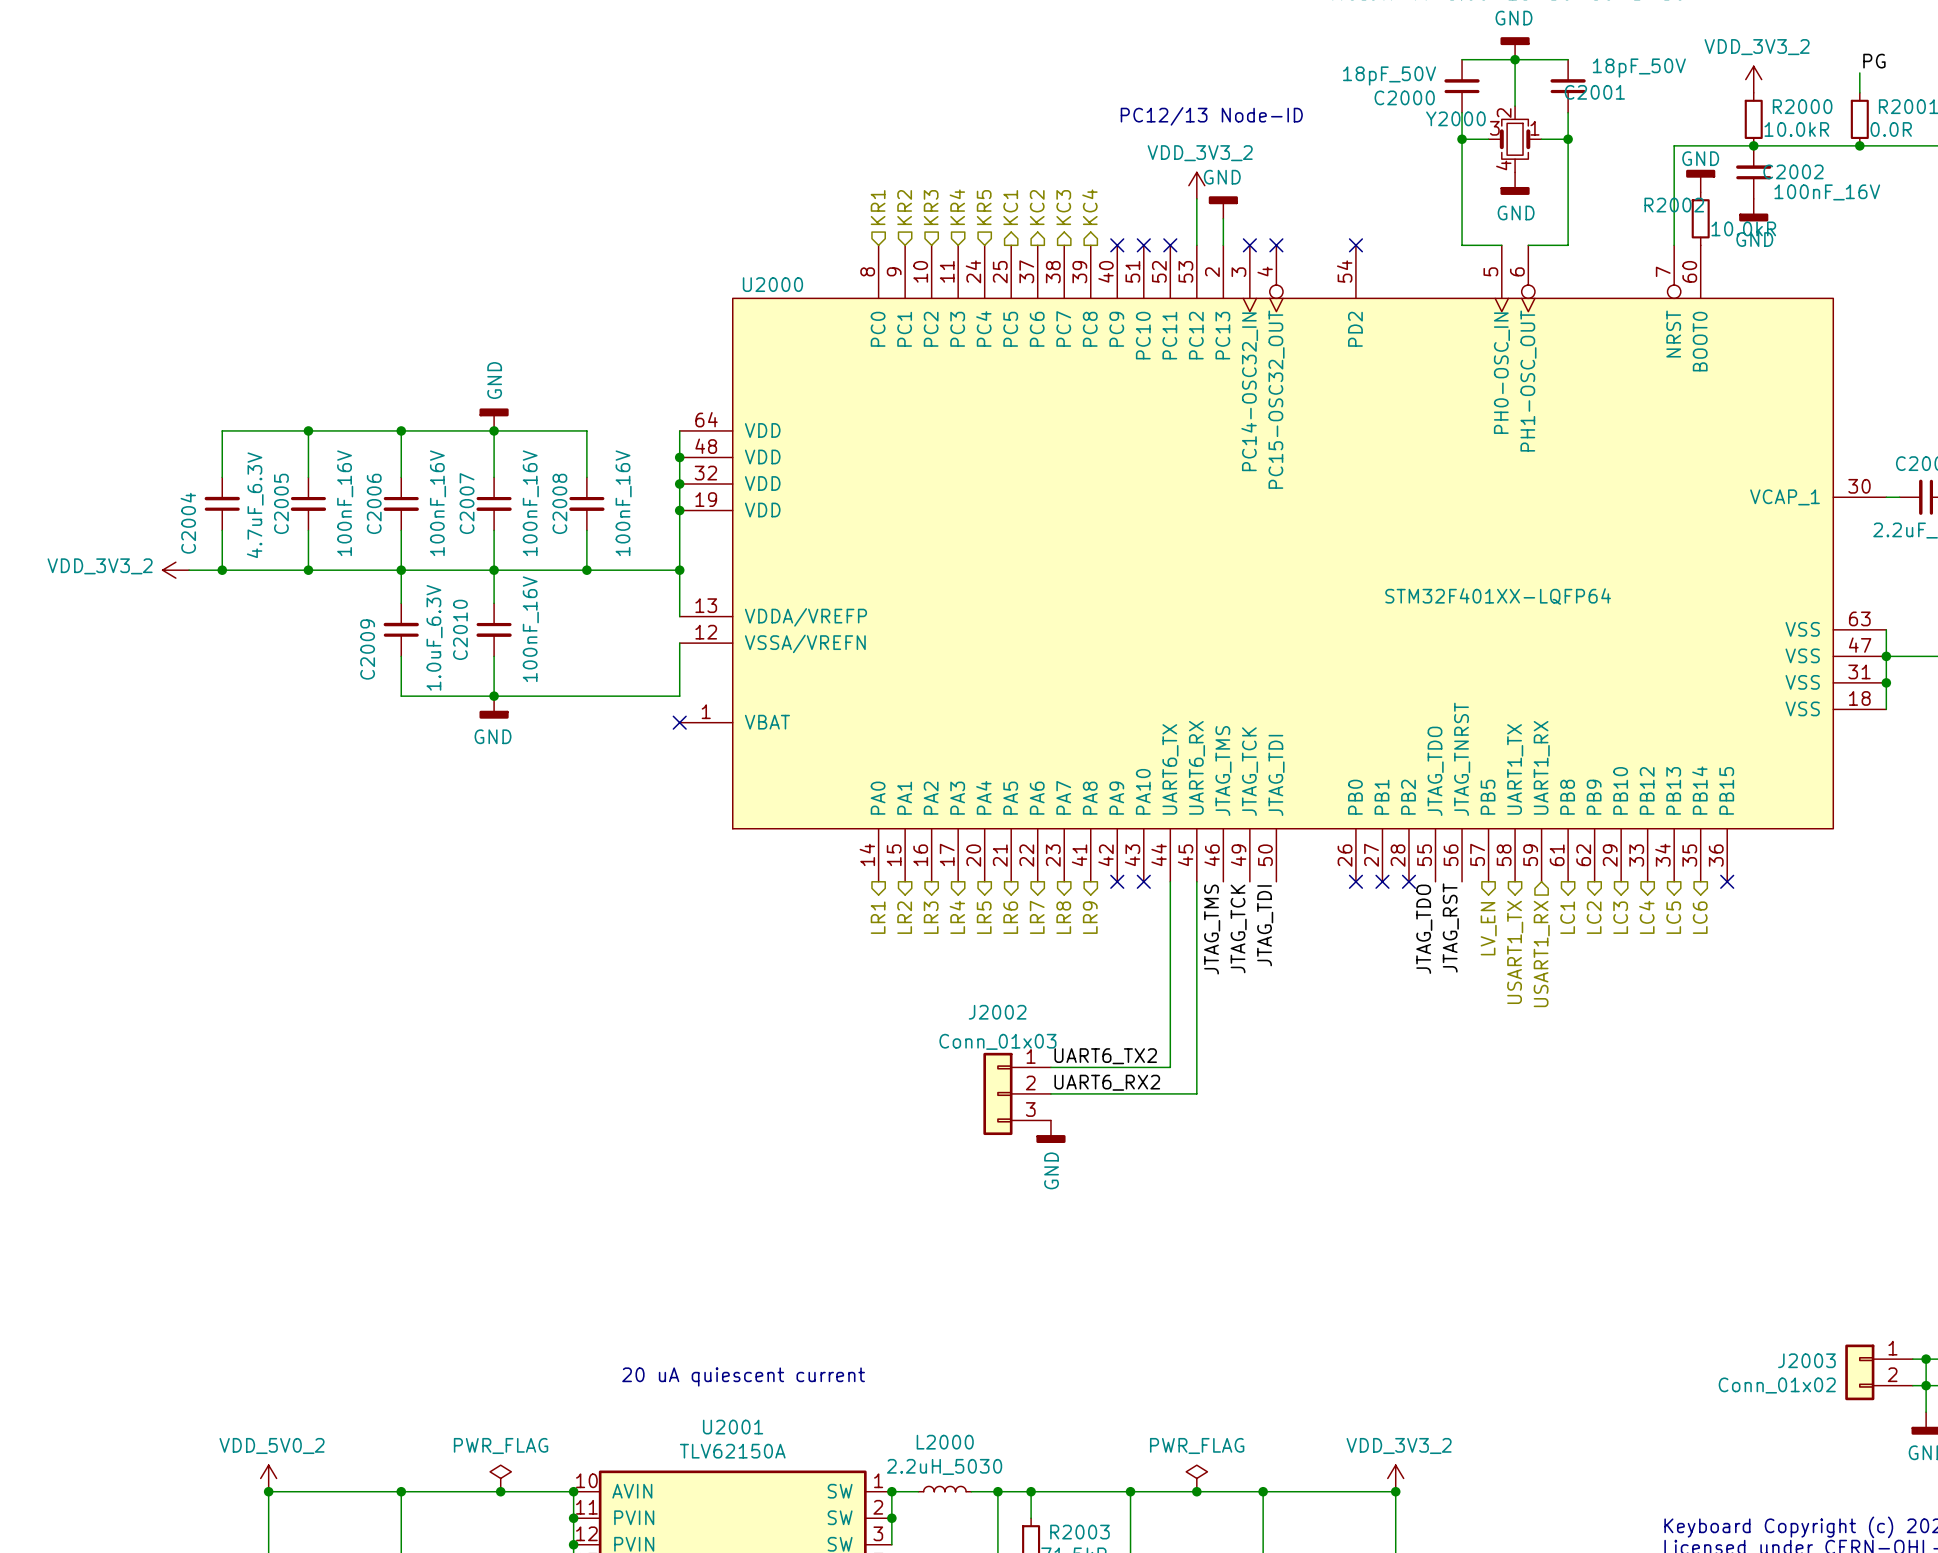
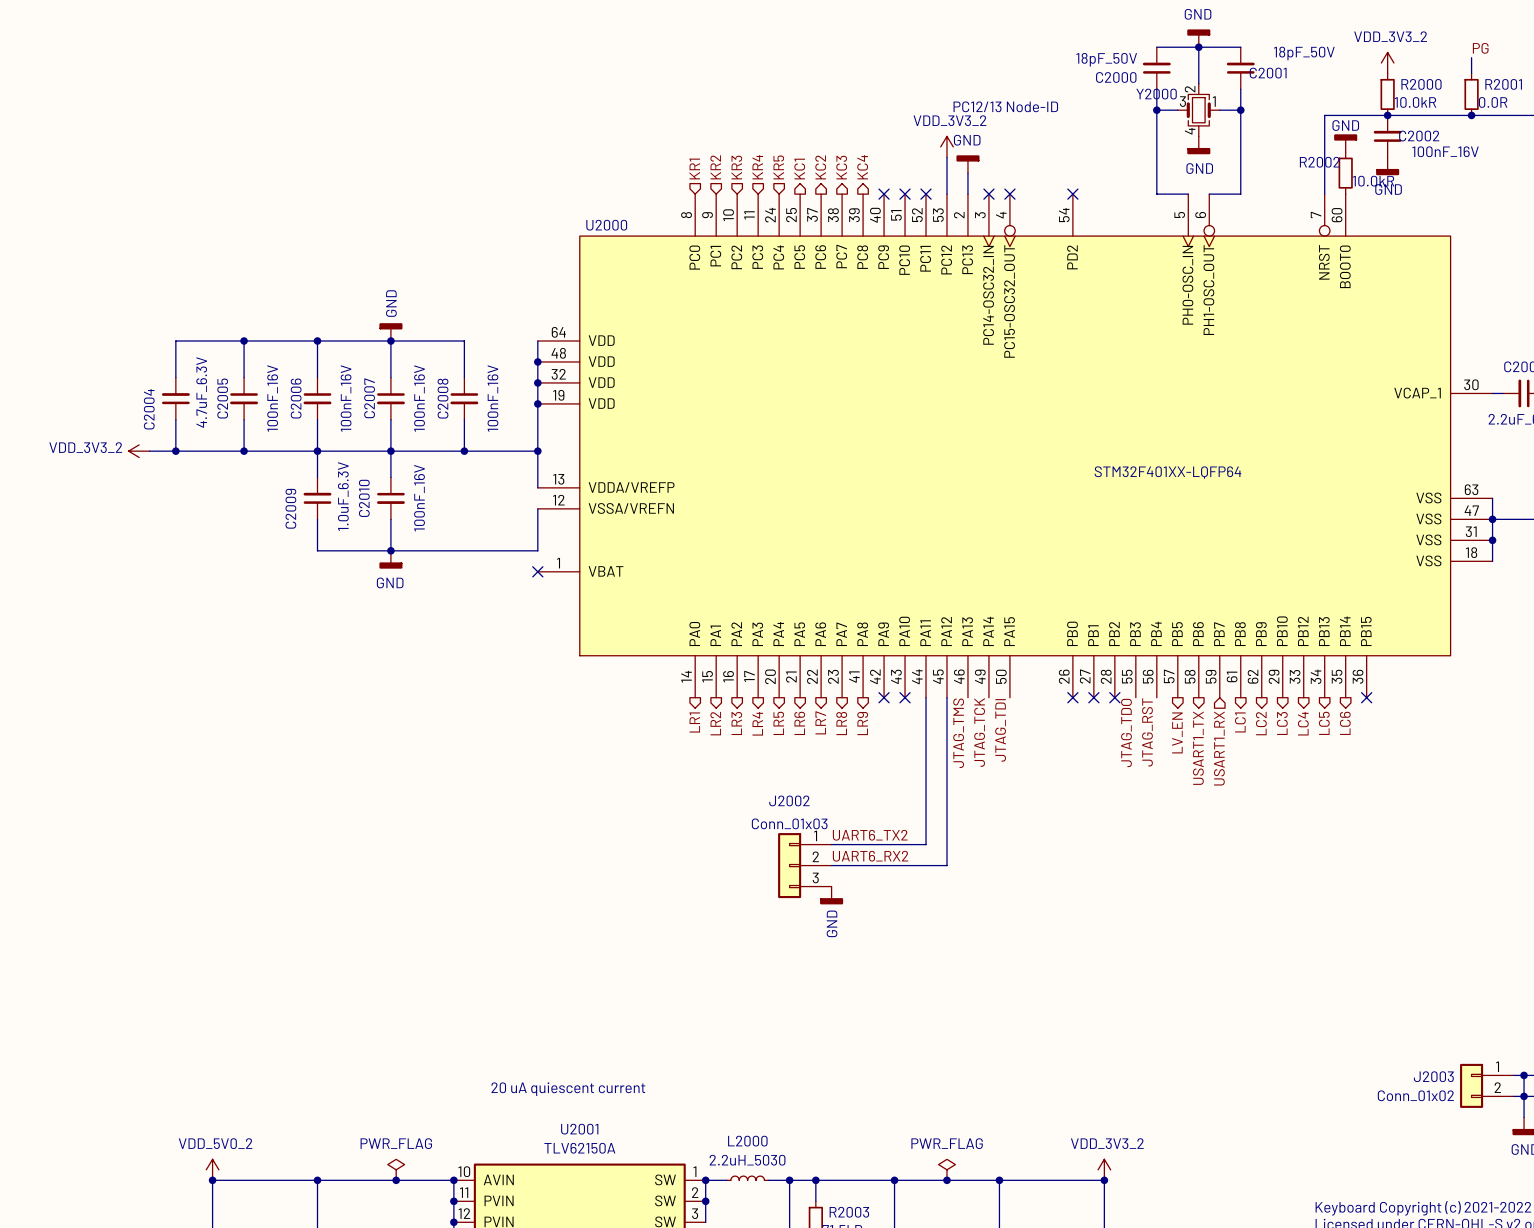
text position: PC12/13 Node-ID (1211, 116) -> PC12/13 Node-ID (1005, 106)
U2000 symbol: [679, 245, 1887, 882] -> [537, 194, 1493, 698]

